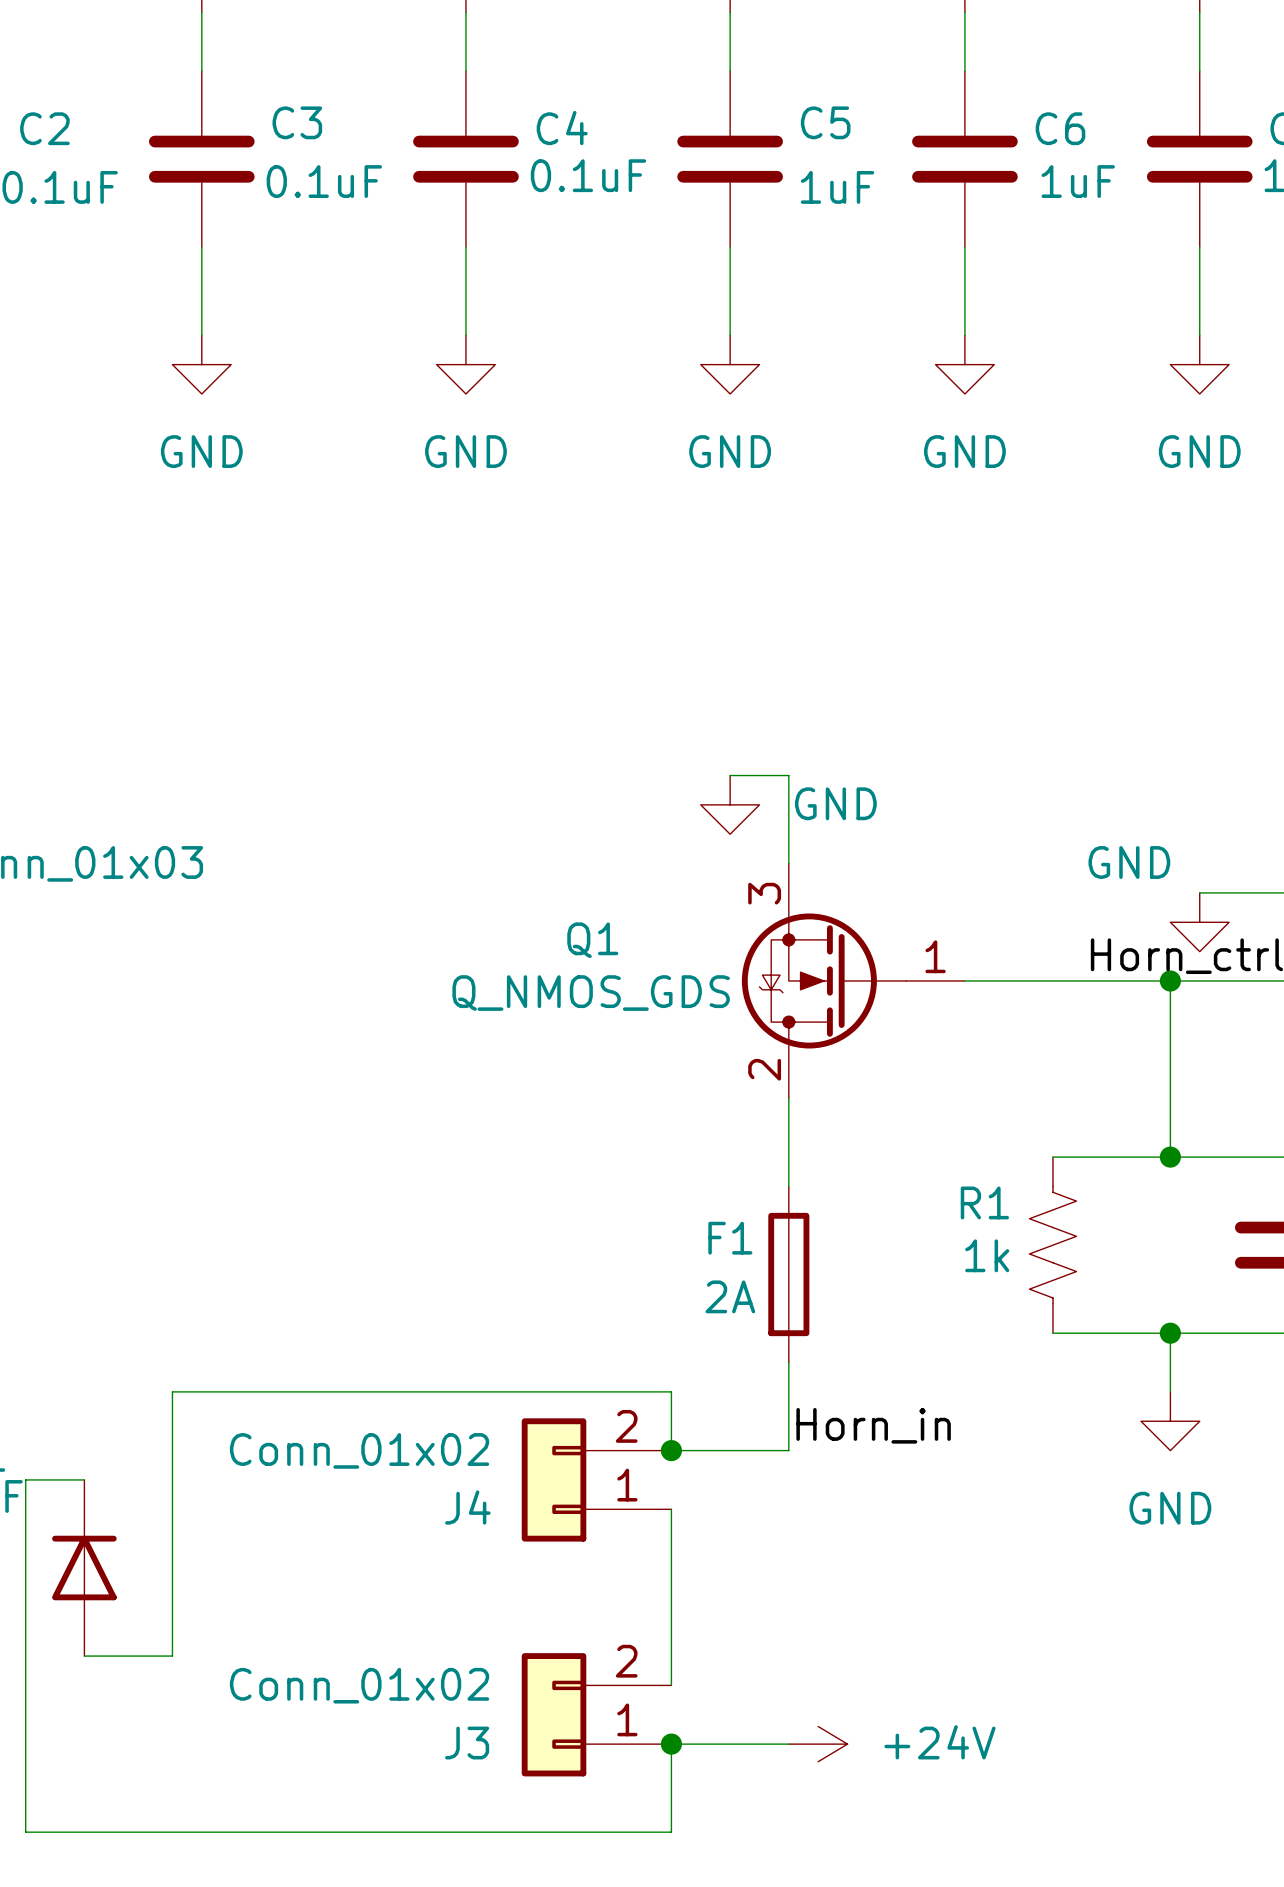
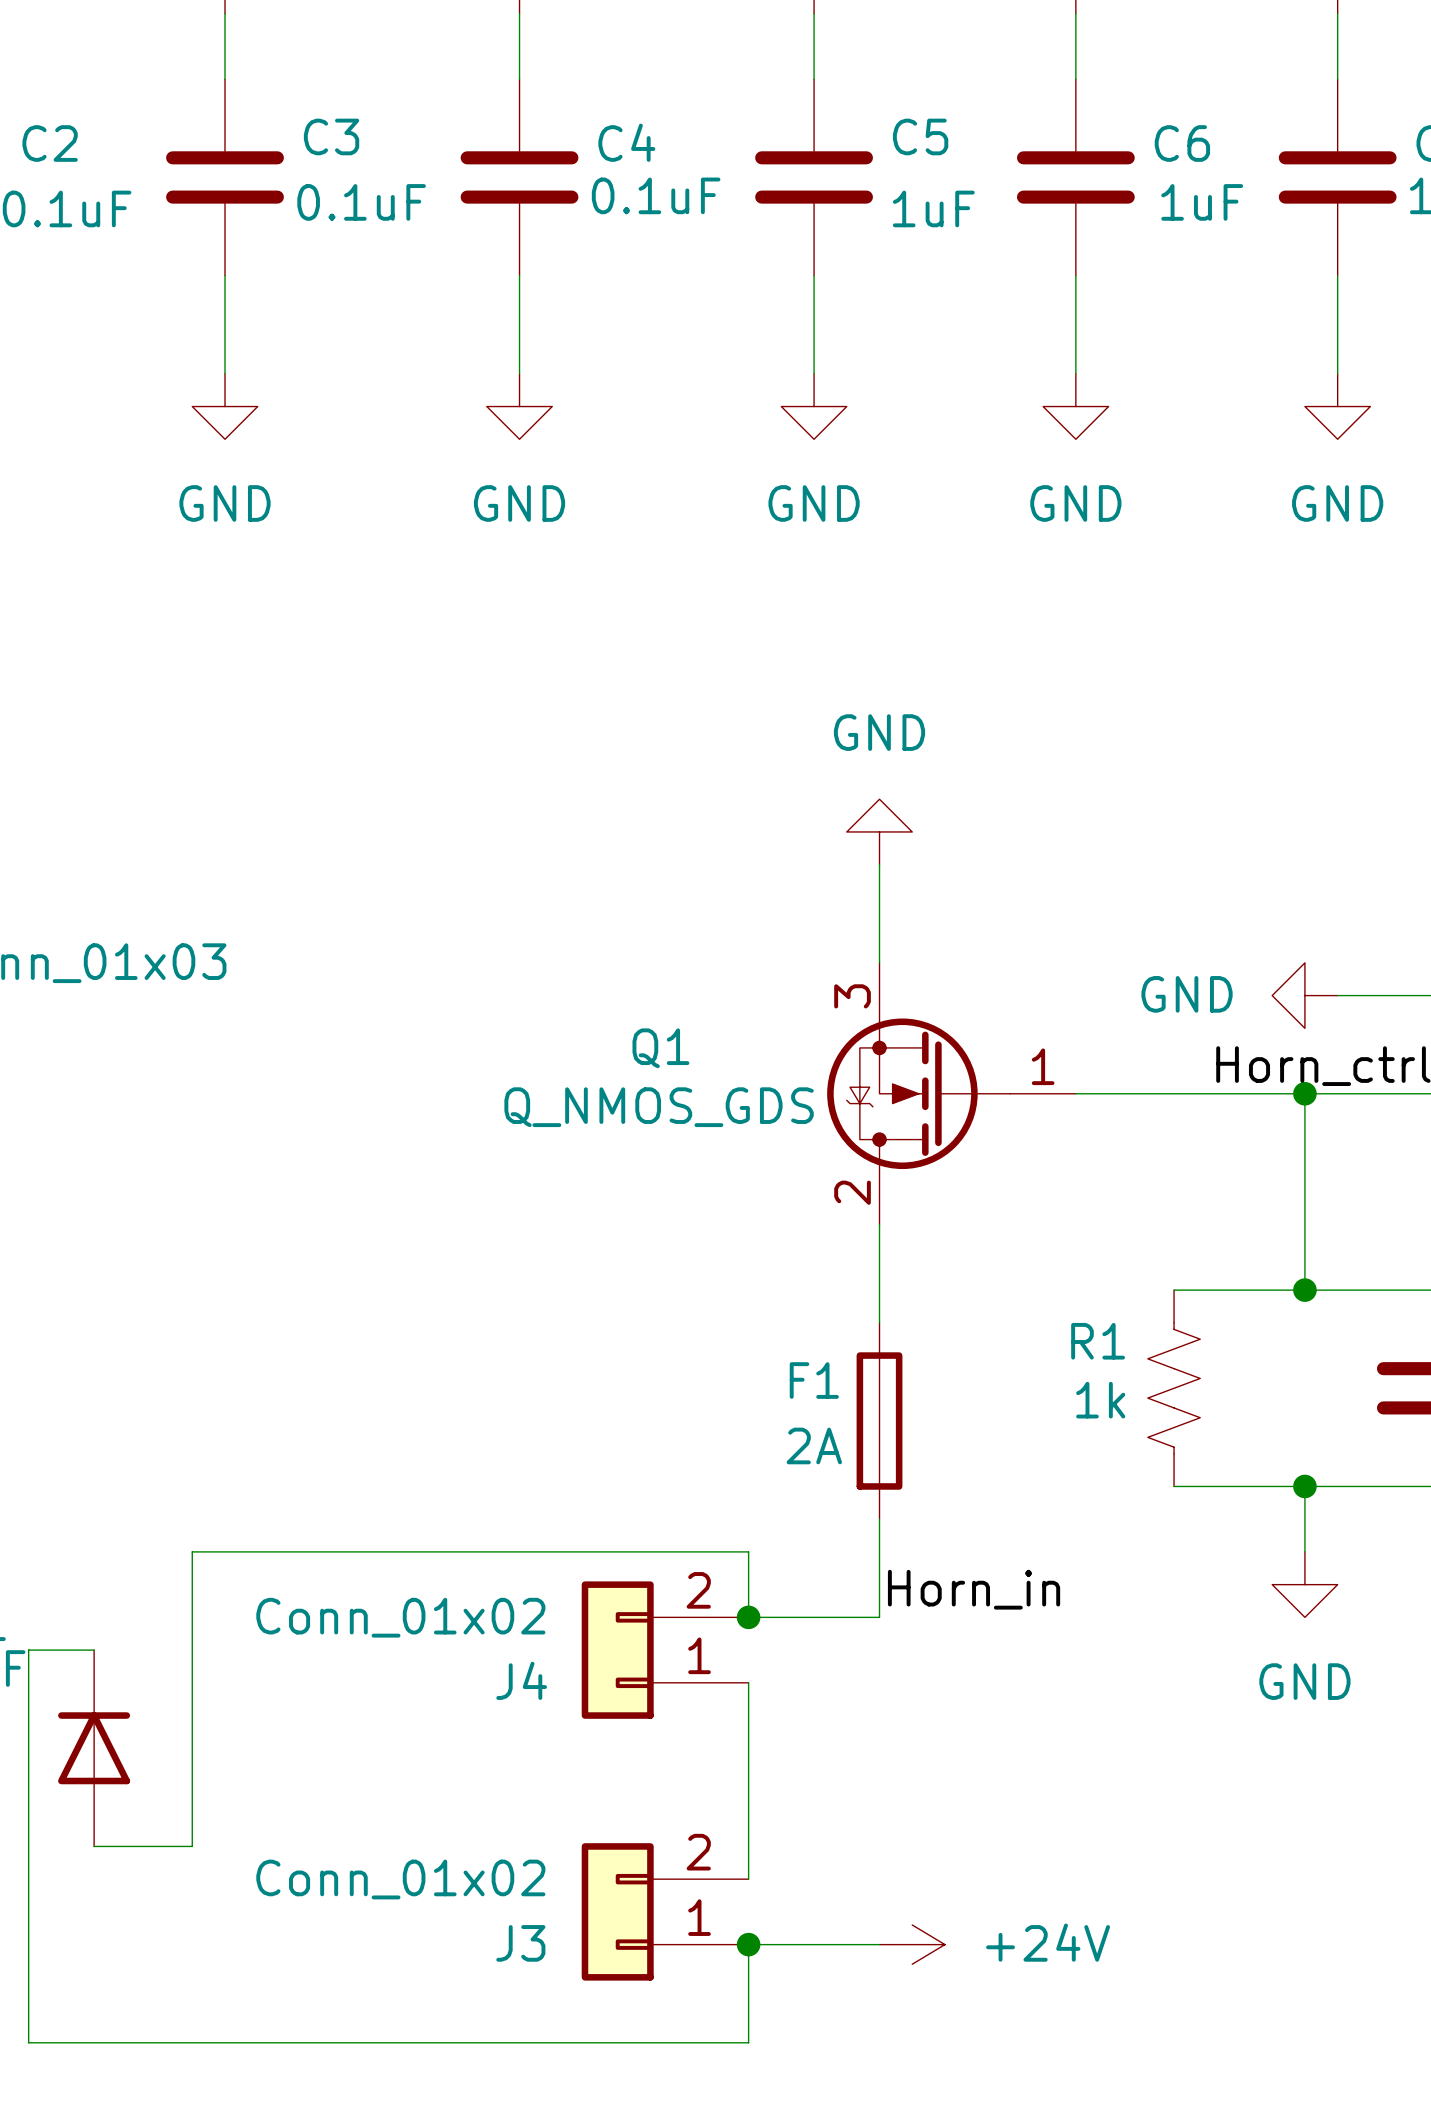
wire: (730, 775) (788, 775) -> none
power symbol text position: GND (835, 803) -> GND (879, 732)
power symbol rotation: 0° (730, 804) -> 180° (879, 831)
power symbol position: GND (730, 804) -> GND (879, 831)
power symbol text position: GND (1129, 862) -> GND (1187, 994)
power symbol rotation: 0° (1199, 922) -> 90° clockwise (1304, 995)
power symbol position: GND (1199, 922) -> GND (1304, 995)

